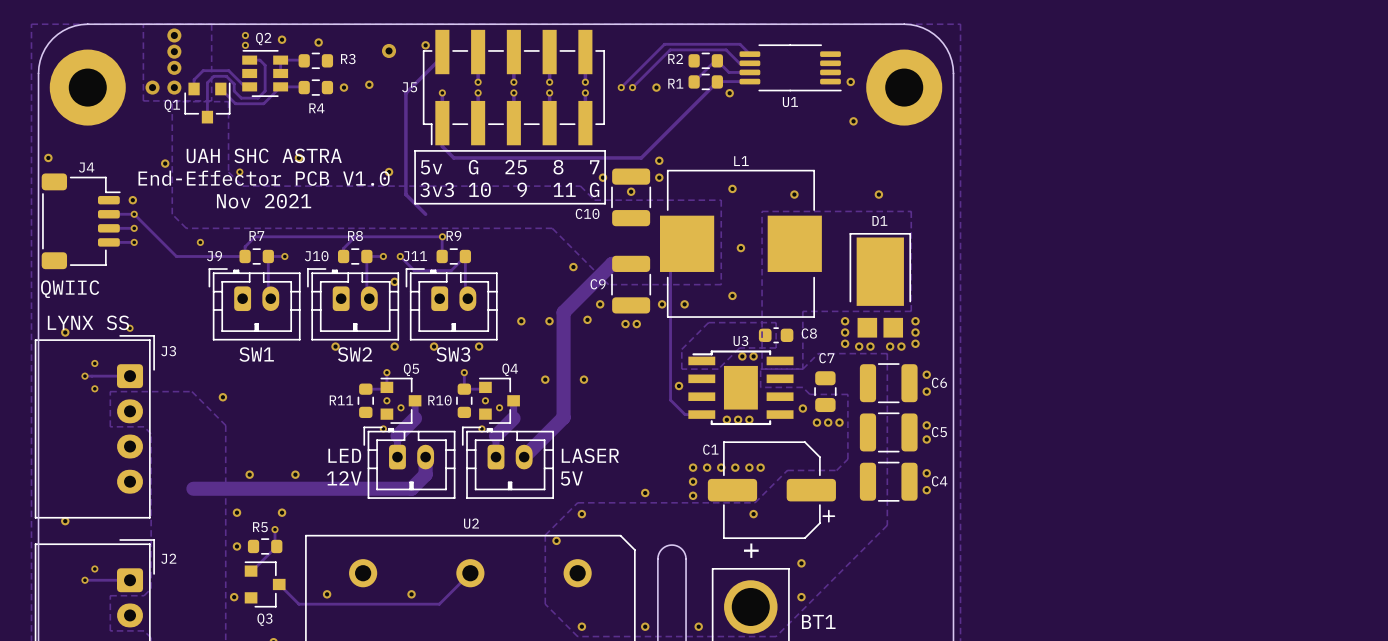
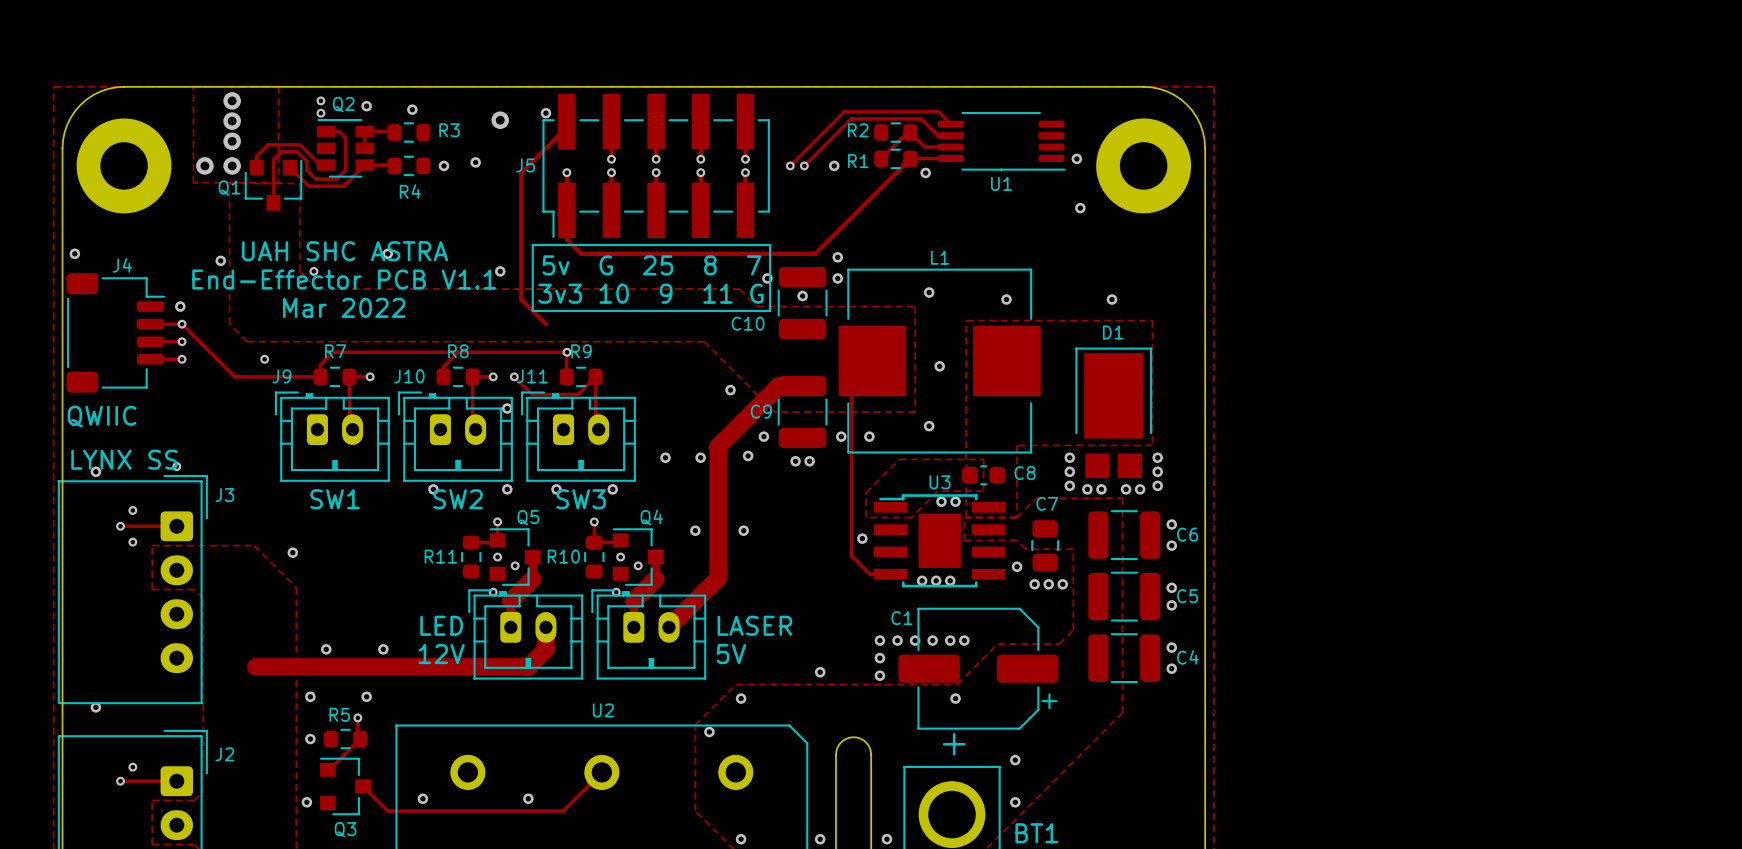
text: End-Effector PCB V1.0 (264, 178) -> End-Effector PCB V1.1 (344, 279)
text: Nov 2021 (264, 201) -> Mar 2022 (344, 307)

